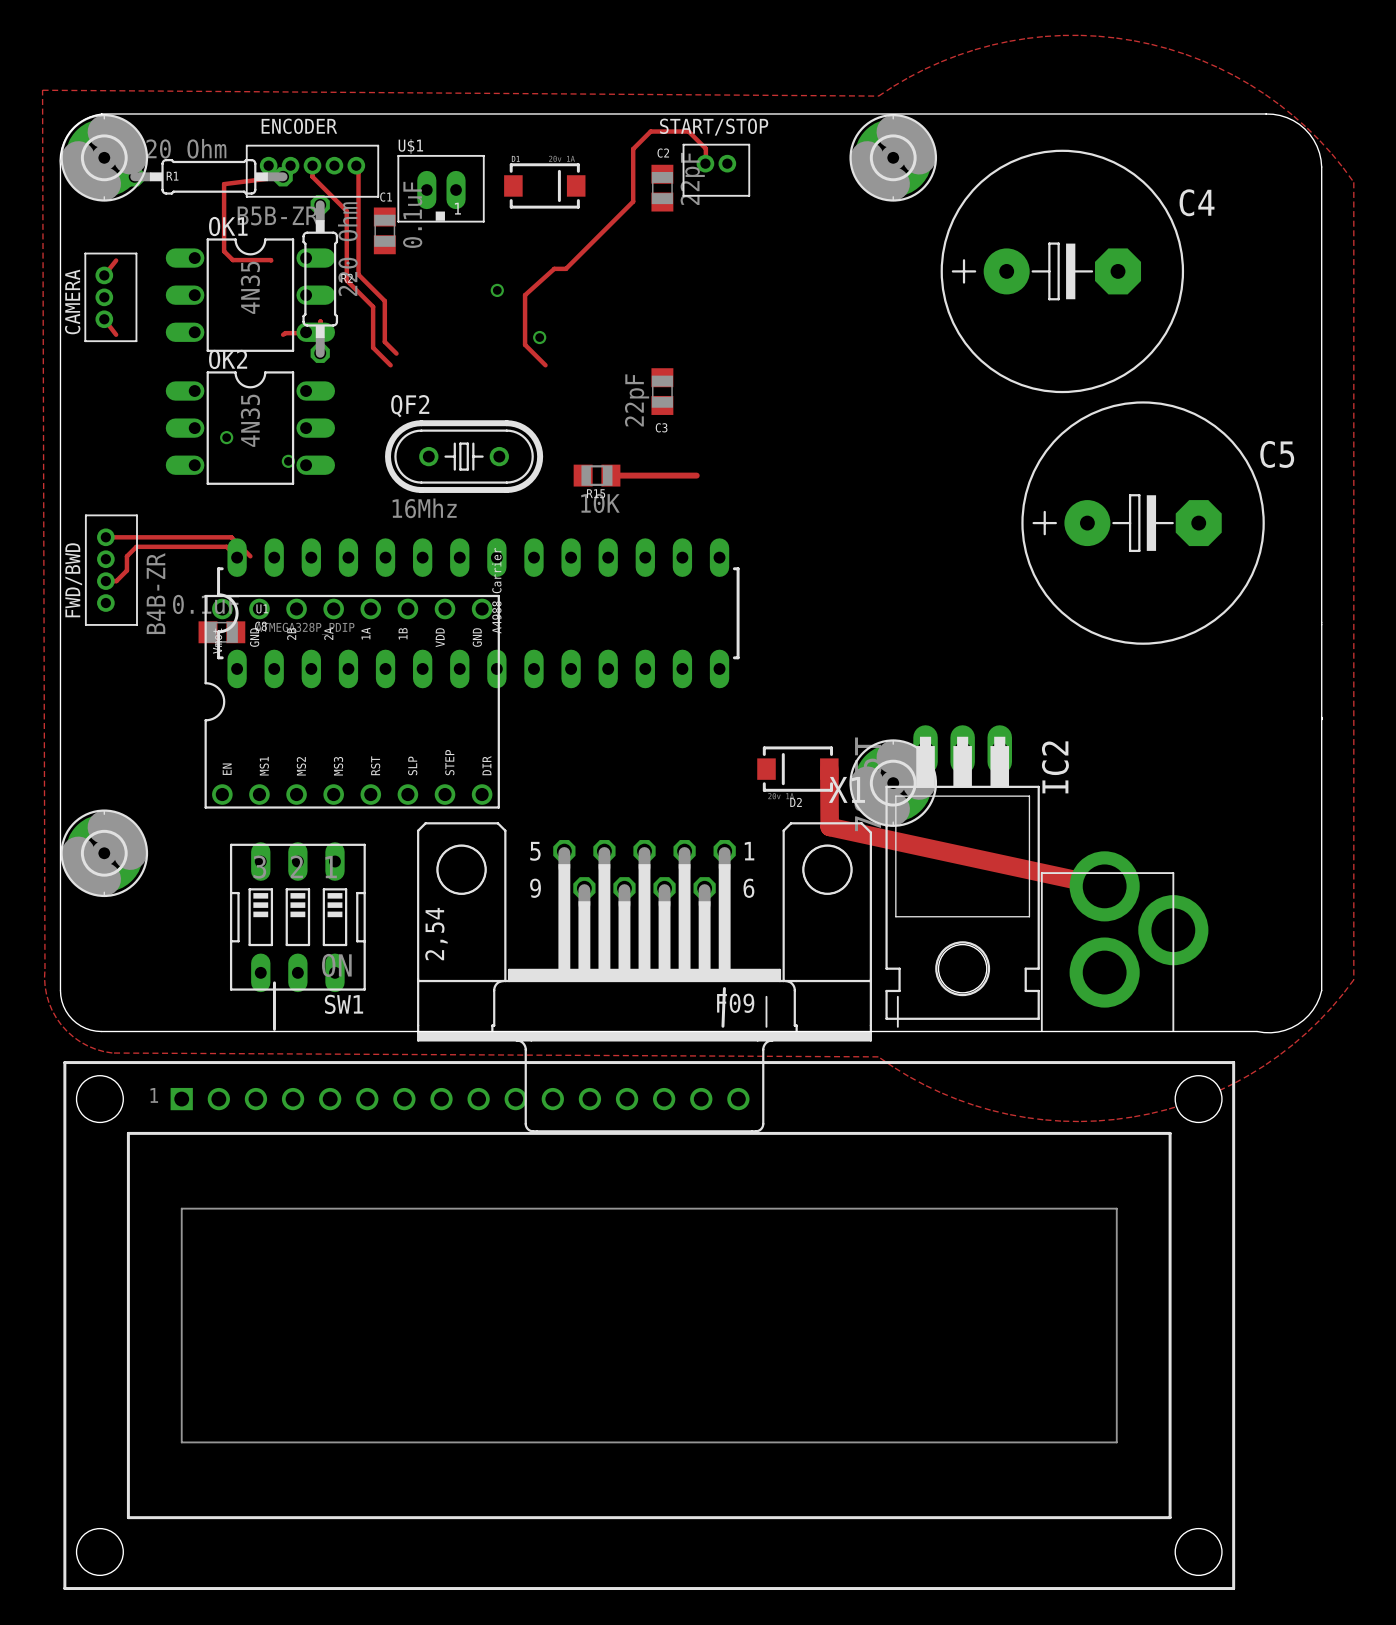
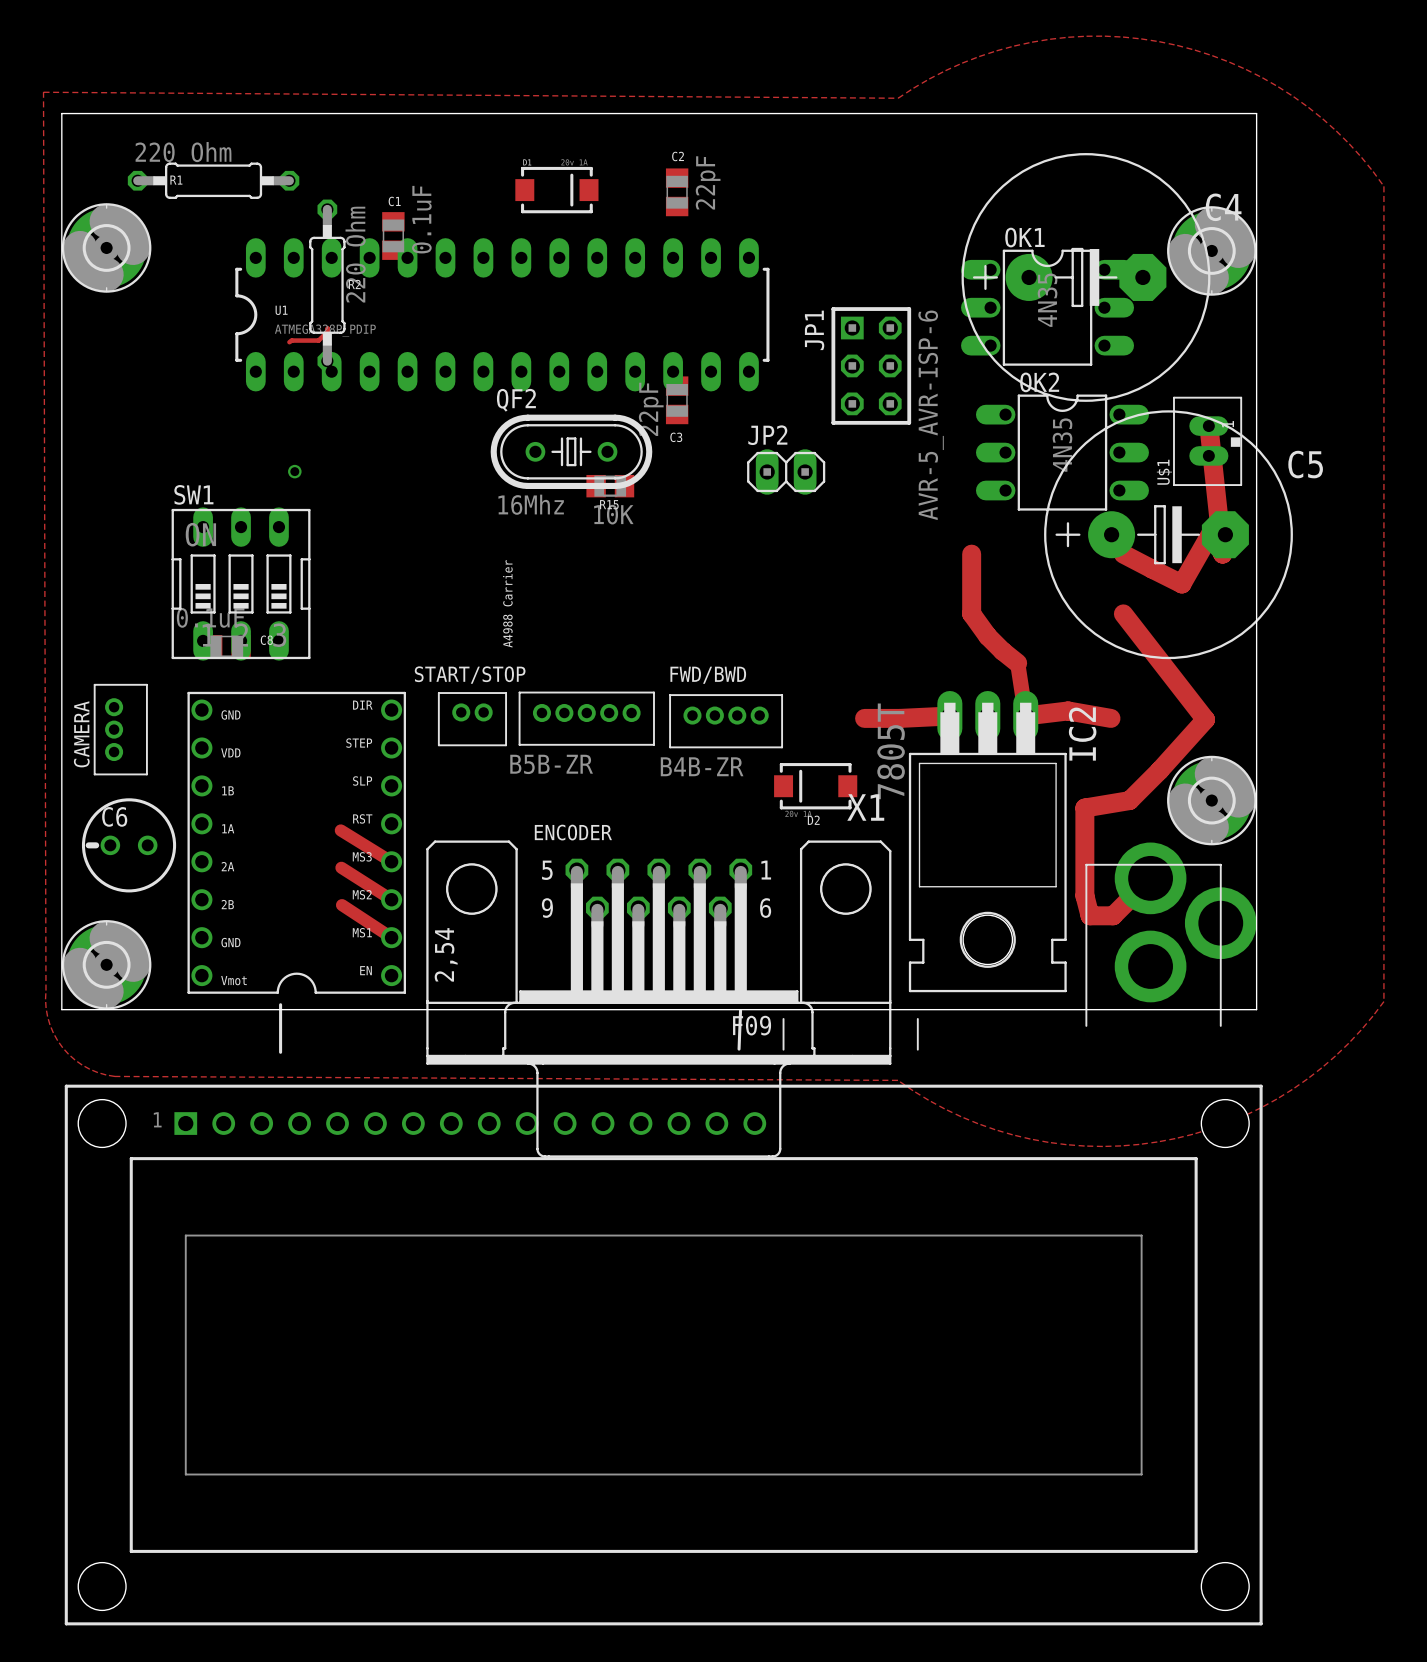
U$1 name position: U$1 (410, 146) -> U$1 (1164, 472)
U$1 footprint: [397, 154, 485, 223] -> [1173, 396, 1243, 487]
part position: (104, 157) -> (106, 247)
part position: (893, 157) -> (1211, 250)
track: (705, 163) (705, 148) (688, 131) (650, 131) (633, 149) (633, 201) (565, 268) (554, 268) (525, 295) (525, 344) (545, 365) -> none
track: (312, 165) (312, 176) (346, 211) (346, 280) (373, 306) (373, 347) (390, 365) -> none
track: (356, 165) (358, 172) (358, 274) (384, 301) (384, 341) (396, 353) -> none
board edge: (60, 167) (61, 148) (70, 131) (84, 119) (101, 113) (1266, 113) (1286, 117) (1299, 124) (1313, 140) (1319, 153) (1321, 167) (1321, 624) (1321, 990) (1316, 1003) (1308, 1015) (1297, 1024) (1285, 1030) (1271, 1032) (101, 1031) (85, 1028) (72, 1019) (63, 1006) (60, 987) -> (61, 170) (61, 113) (1256, 113) (1256, 1009) (61, 1009)
START/STOP: (716, 170) -> none
ENCODER: B5B-ZR (312, 171) -> none
track: (283, 176) (224, 184) (224, 251) (232, 260) (271, 260) -> none
track: (116, 260) (104, 275) -> none
via: (497, 290) -> none
OK1 position: (250, 295) -> (1047, 307)
CAMERA: (110, 297) -> none
track: (104, 319) (116, 334) -> none
via: (539, 337) -> none
JP1: none -> AVR-5_AVR-ISP-6 (871, 365)
track: none -> (1208, 426) (1222, 554) (1211, 531) (1181, 584) (1123, 554)
OK2 position: (250, 428) -> (1062, 452)
via: (226, 437) -> none
QF2 position: (464, 456) -> (571, 451)
JP2: none -> (786, 471)
track: (610, 475) (696, 475) -> none
track: (105, 537) (103, 537) (231, 537) (250, 556) -> none
track: none -> (971, 554) (971, 613) (987, 636) (1017, 663) (1025, 716) (1068, 710) (1111, 718)
track: (240, 561) (226, 546) (136, 546) (126, 556) (126, 570) (116, 581) (105, 581) -> none
FWD/BWD: B4B-ZR (111, 570) -> none
track: none -> (1123, 613) (1205, 719) (1129, 800) (1084, 808) (1084, 895) (1090, 915) (1113, 915) (1150, 878)
U1 position: (478, 613) -> (502, 314)
track: none -> (949, 716) (864, 718)
part: (352, 701) -> none
START/STOP: none -> (472, 719)
ENCODER: none -> B5B-ZR (586, 718)
FWD/BWD: none -> B4B-ZR (726, 721)
CAMERA: none -> (120, 729)
track: (829, 769) (829, 826) (1104, 886) -> none
part position: (893, 783) -> (1211, 800)
track: none -> (340, 830) (391, 861)
part: none -> (296, 842)
C6: none -> (129, 845)
SW1 footprint: [229, 842, 366, 993] -> [171, 507, 311, 661]
track: none -> (341, 867) (391, 899)
part position: (104, 853) -> (106, 964)
IC2 position: (962, 872) -> (987, 841)
track: none -> (342, 905) (391, 937)
part position: (1124, 941) -> (1171, 934)
SW1 name position: SW1 (343, 1004) -> SW1 (193, 494)

